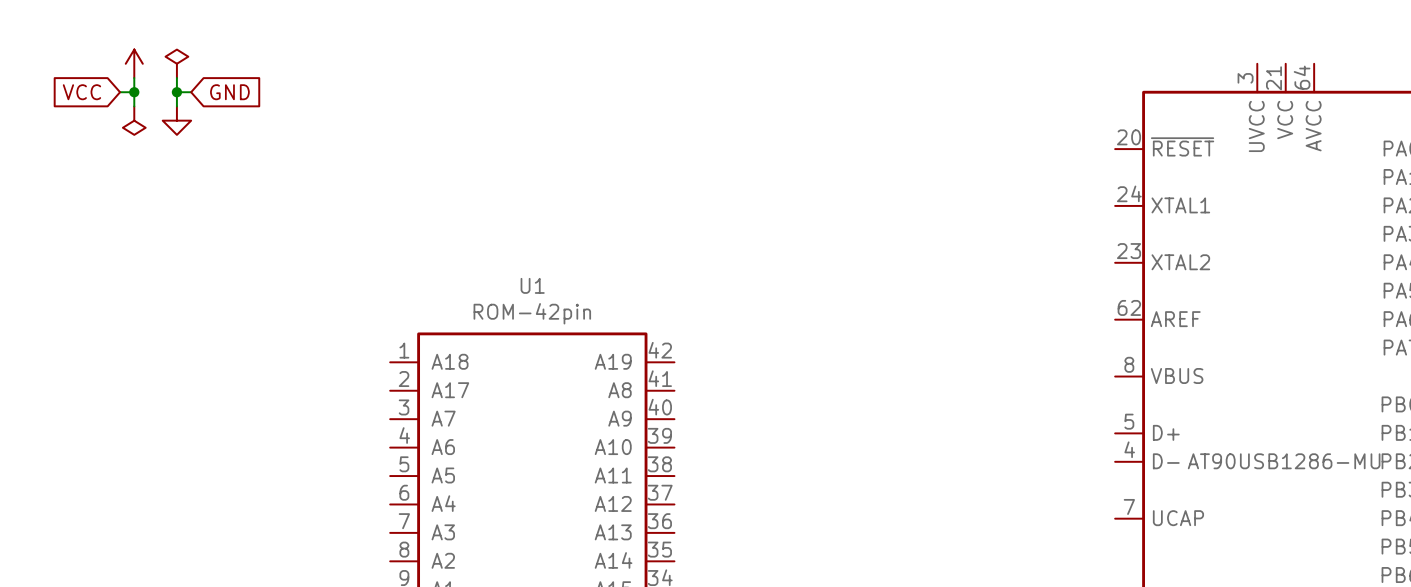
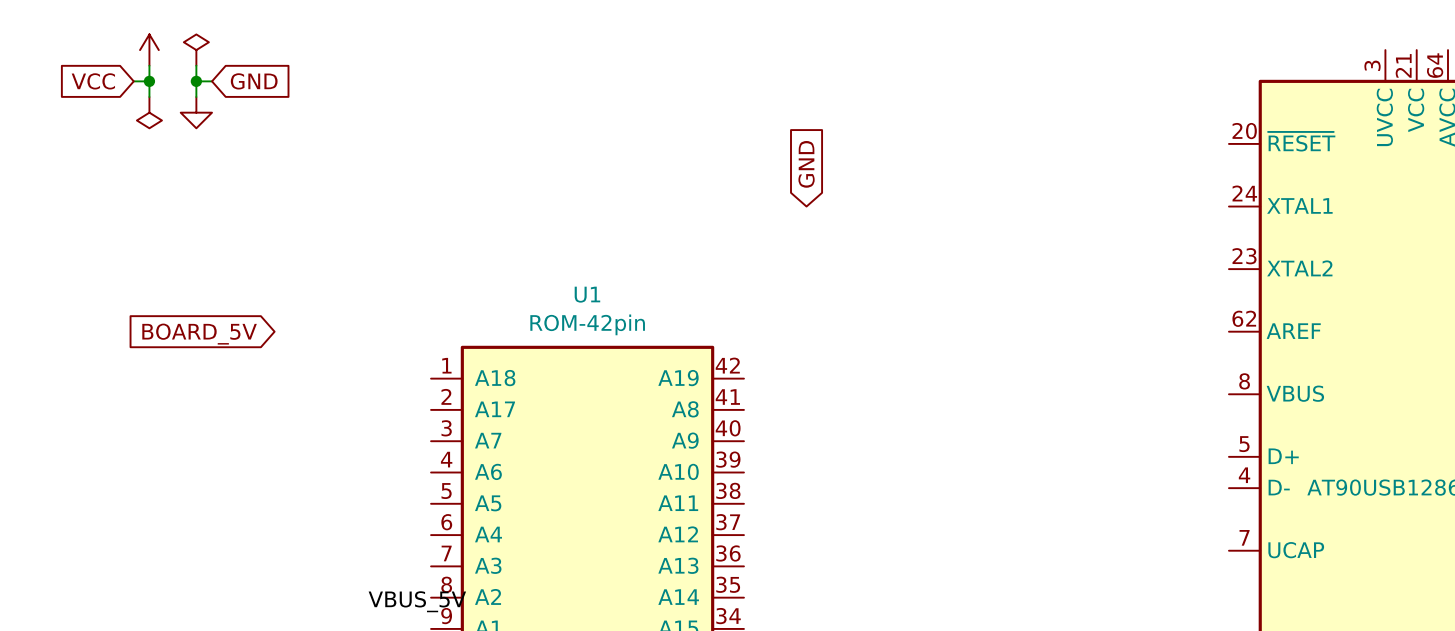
global label: none -> GND (806, 164)
global label: none -> BOARD_5V (199, 334)
label: none -> VBUS_5V (417, 601)

